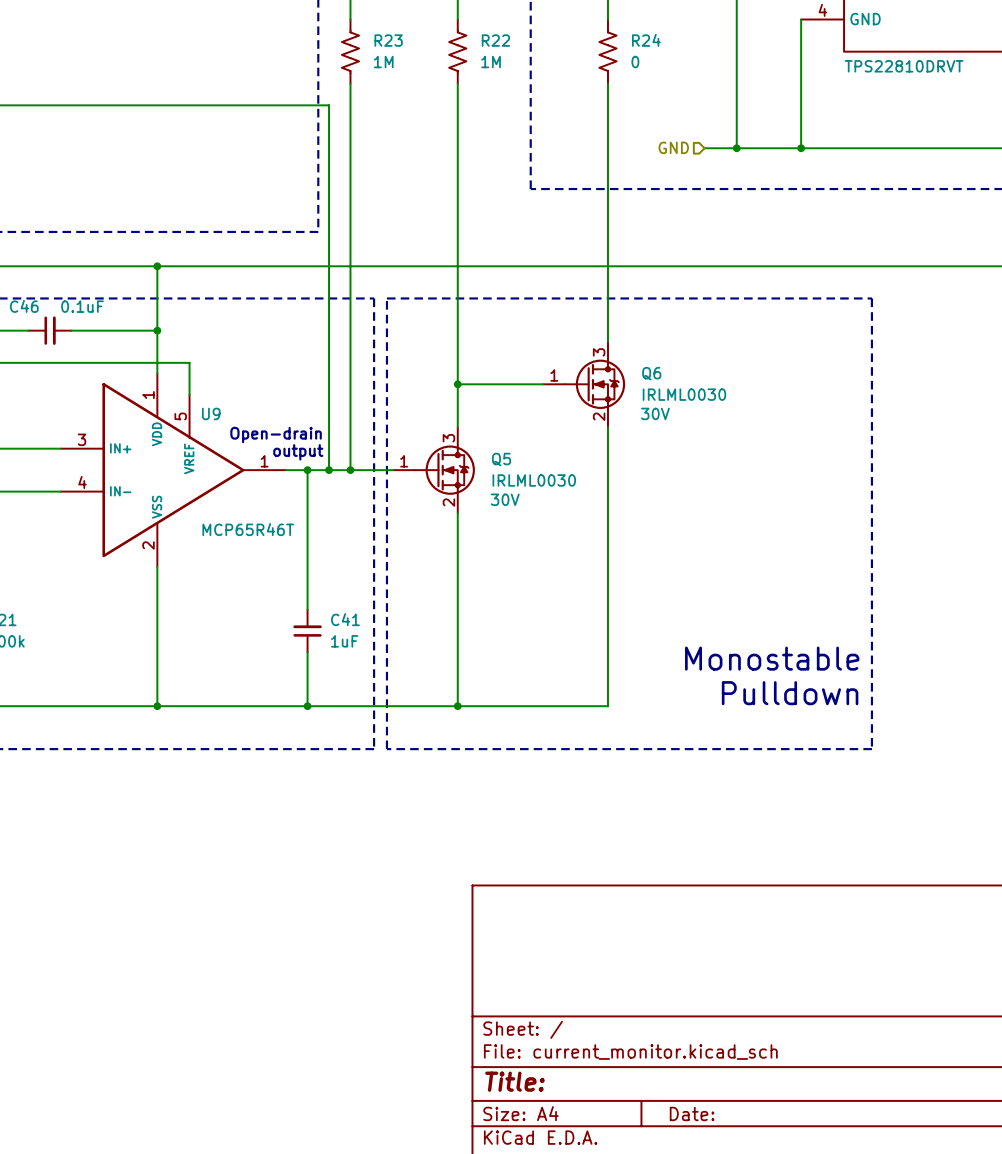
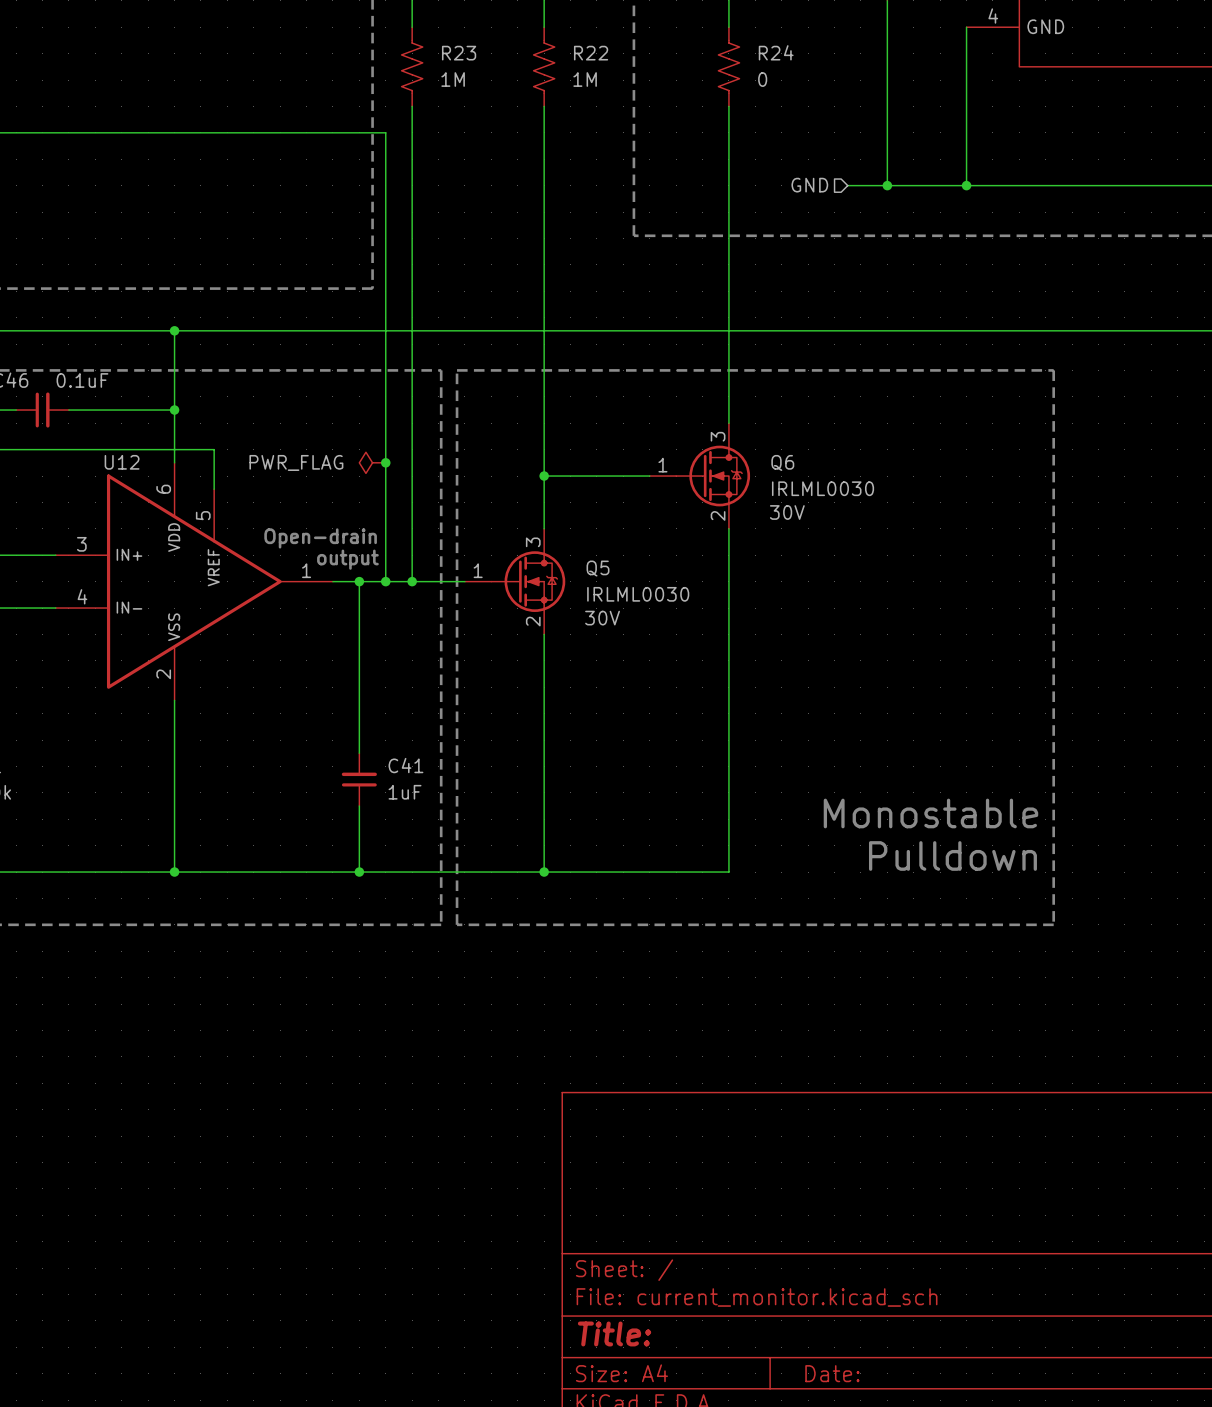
part value: TPS22810DRVT (904, 66) -> none
power symbol: none -> PWR_FLAG (372, 462)
junction: none -> (385, 462)
U9 pin number: 1 (148, 395) -> 6 (163, 489)
U9 name: U9 (211, 413) -> U12 (122, 462)
U9 value: MCP65R46T (248, 529) -> none

